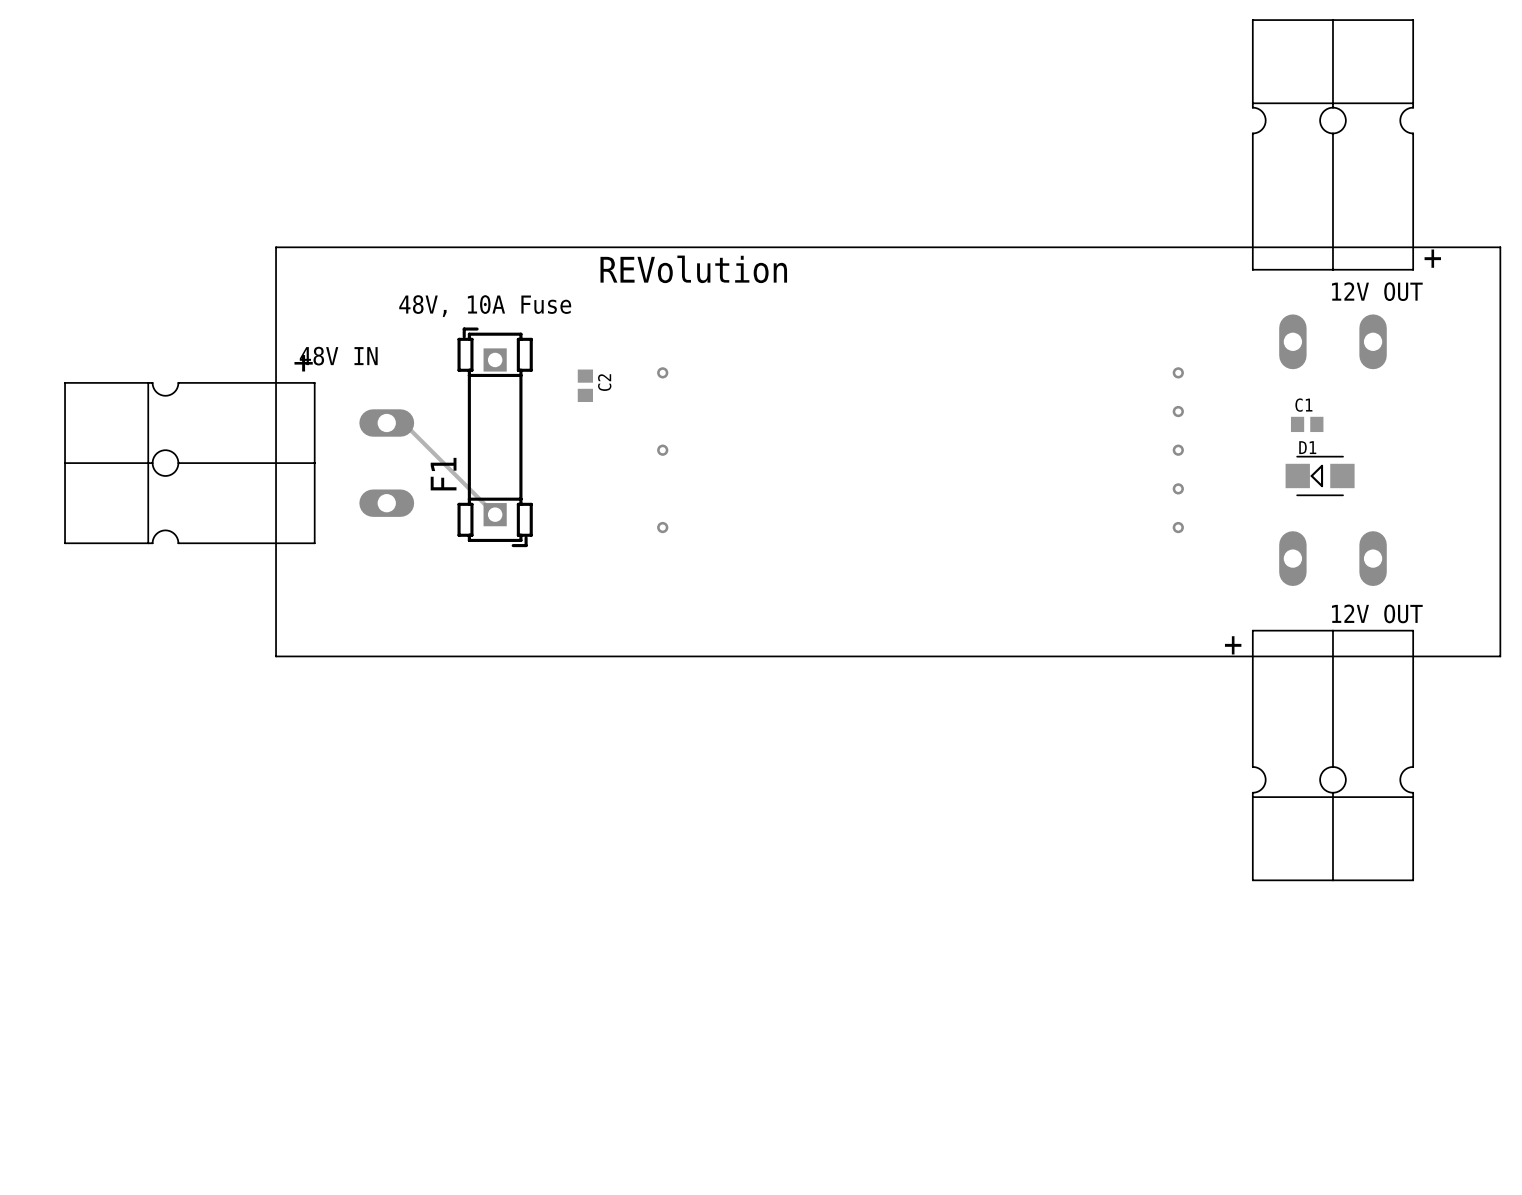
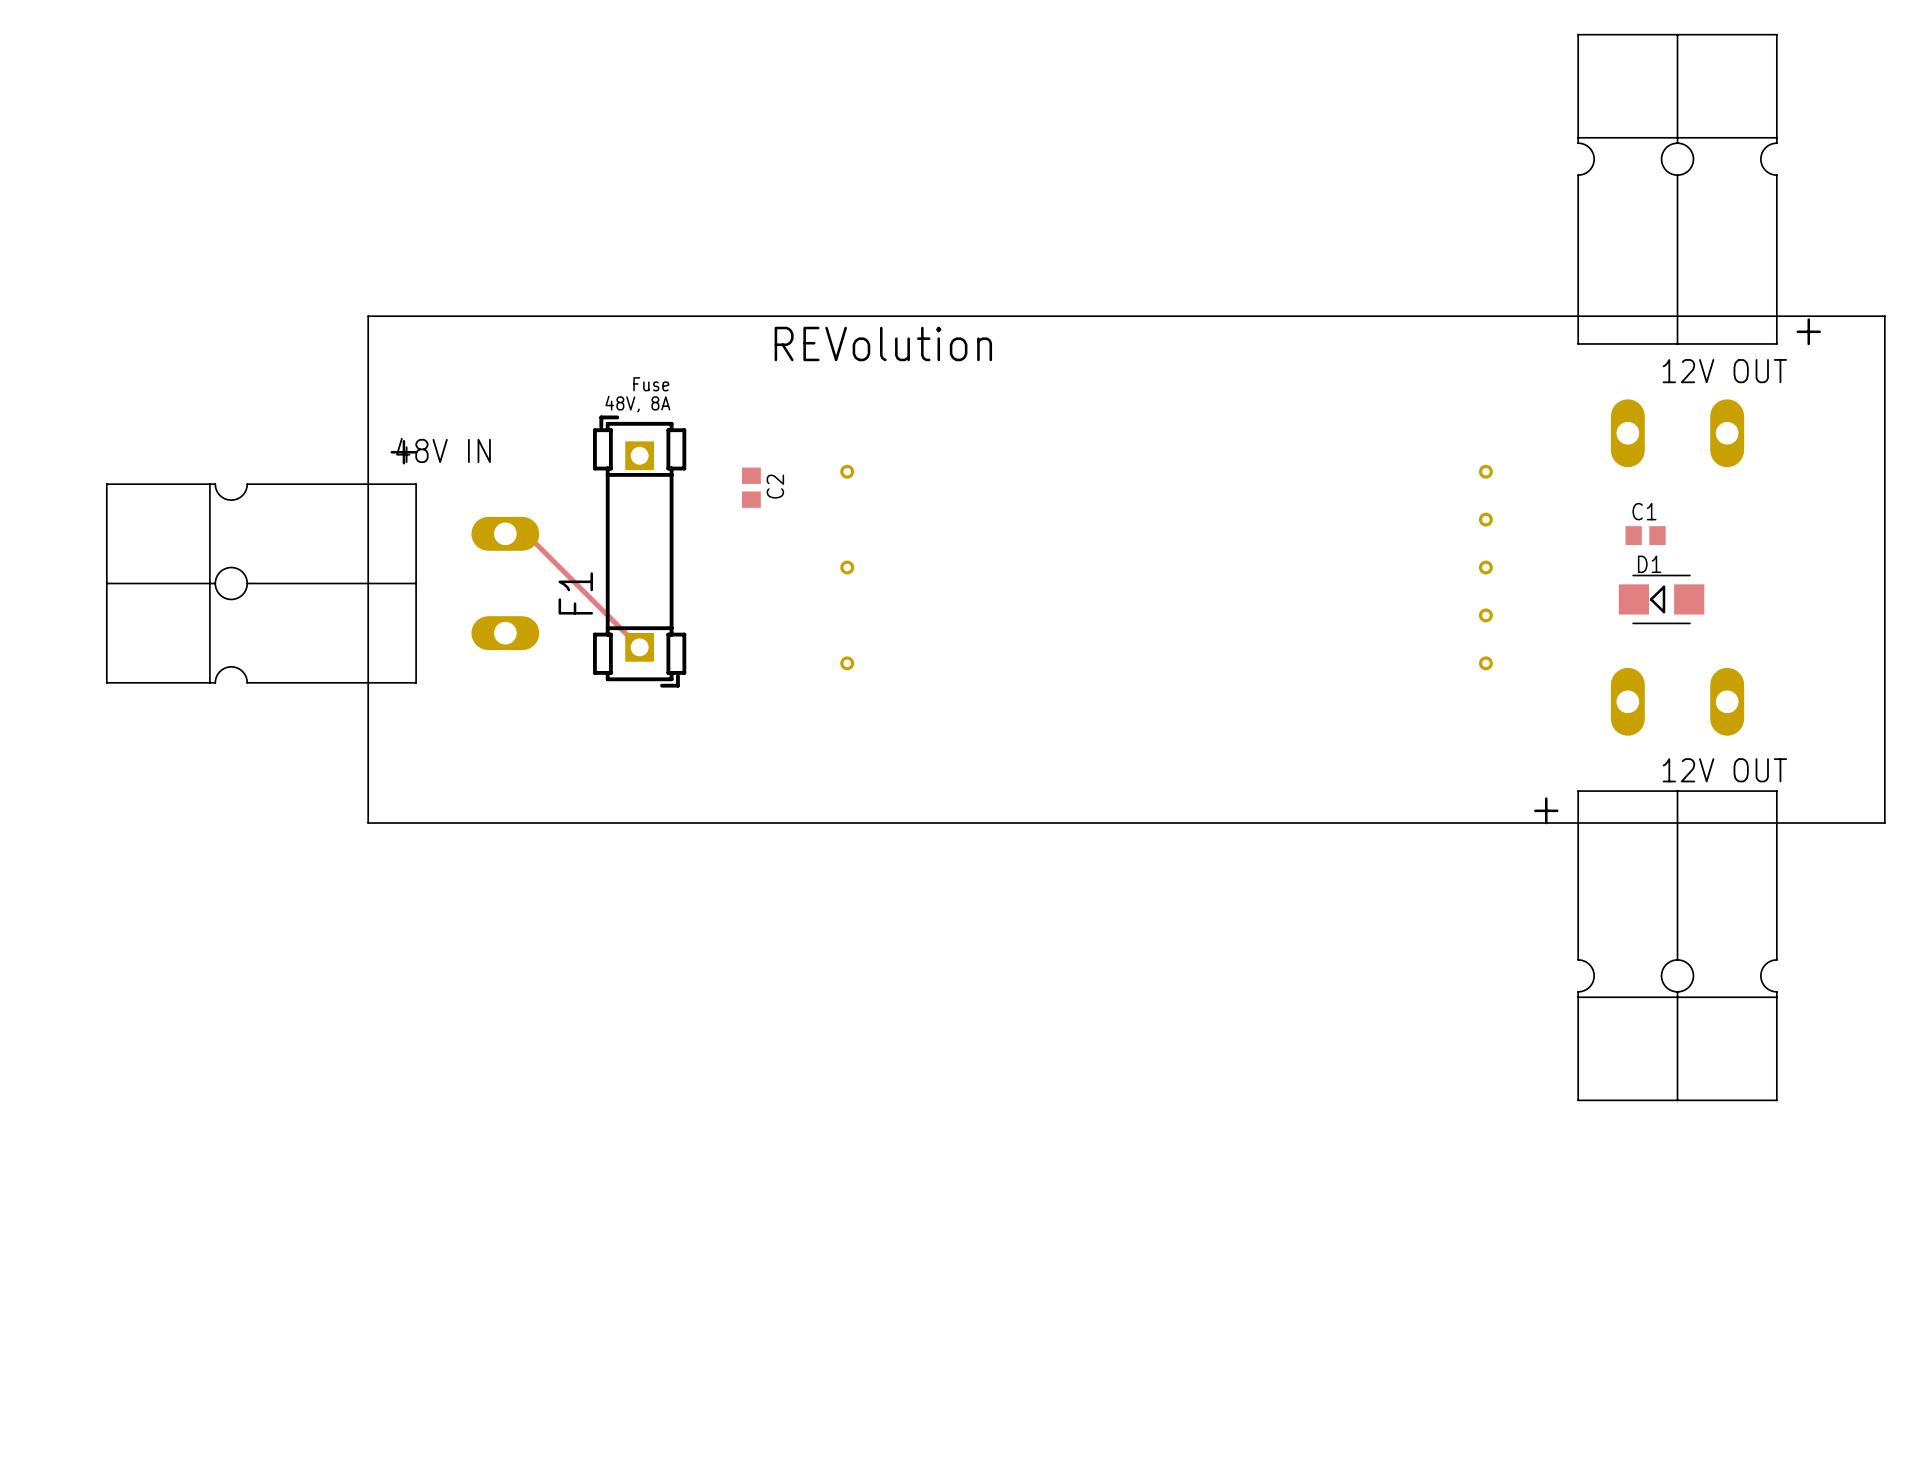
text: none -> Fuse (651, 384)
text: 48V, 10A Fuse (485, 306) -> none
text: none -> 48V, 8A (637, 404)

